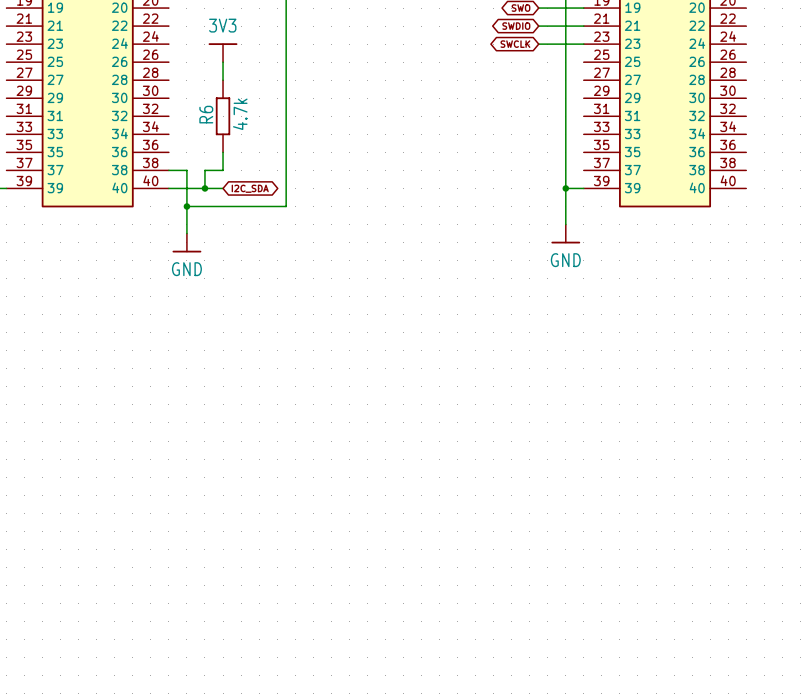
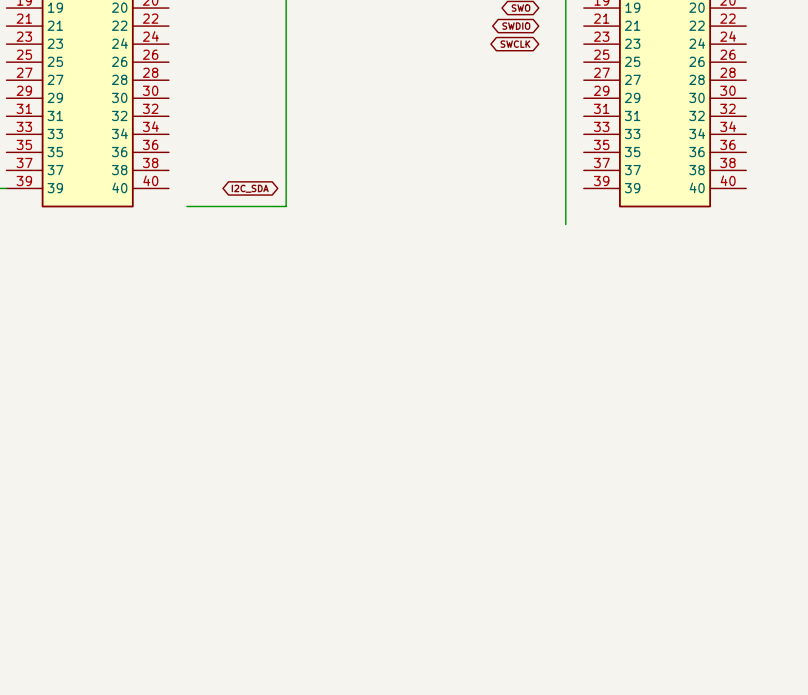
wire: (538, 8) (583, 8) -> none
wire: (538, 26) (583, 26) -> none
wire: (538, 44) (583, 44) -> none
power symbol: 3V3 (223, 52) -> none
wire: (223, 62) (223, 80) -> none
R6: 4.7k (223, 116) -> none
wire: (223, 152) (223, 170) (204, 170) (204, 188) -> none
wire: (168, 170) (186, 170) (186, 233) -> none
wire: (168, 188) (223, 188) -> none
junction: (204, 188) -> none
wire: (565, 188) (583, 188) -> none
junction: (565, 188) -> none
junction: (186, 206) -> none
power symbol: GND (565, 234) -> none
power symbol: GND (186, 243) -> none

